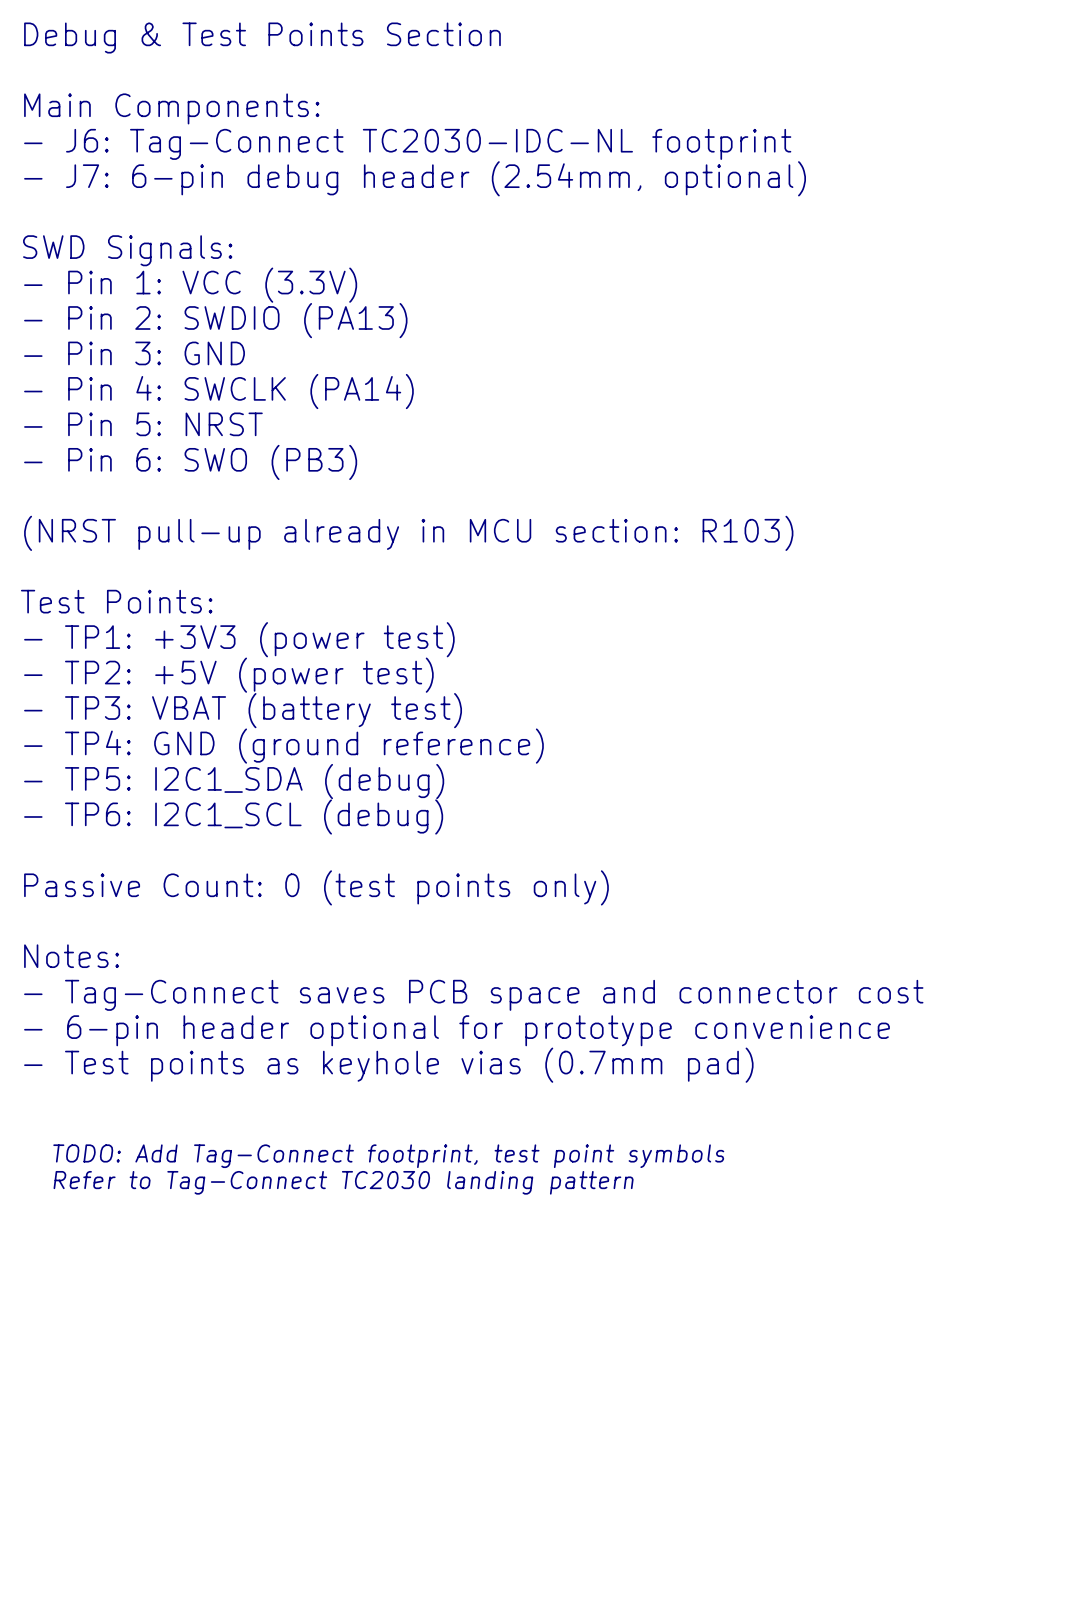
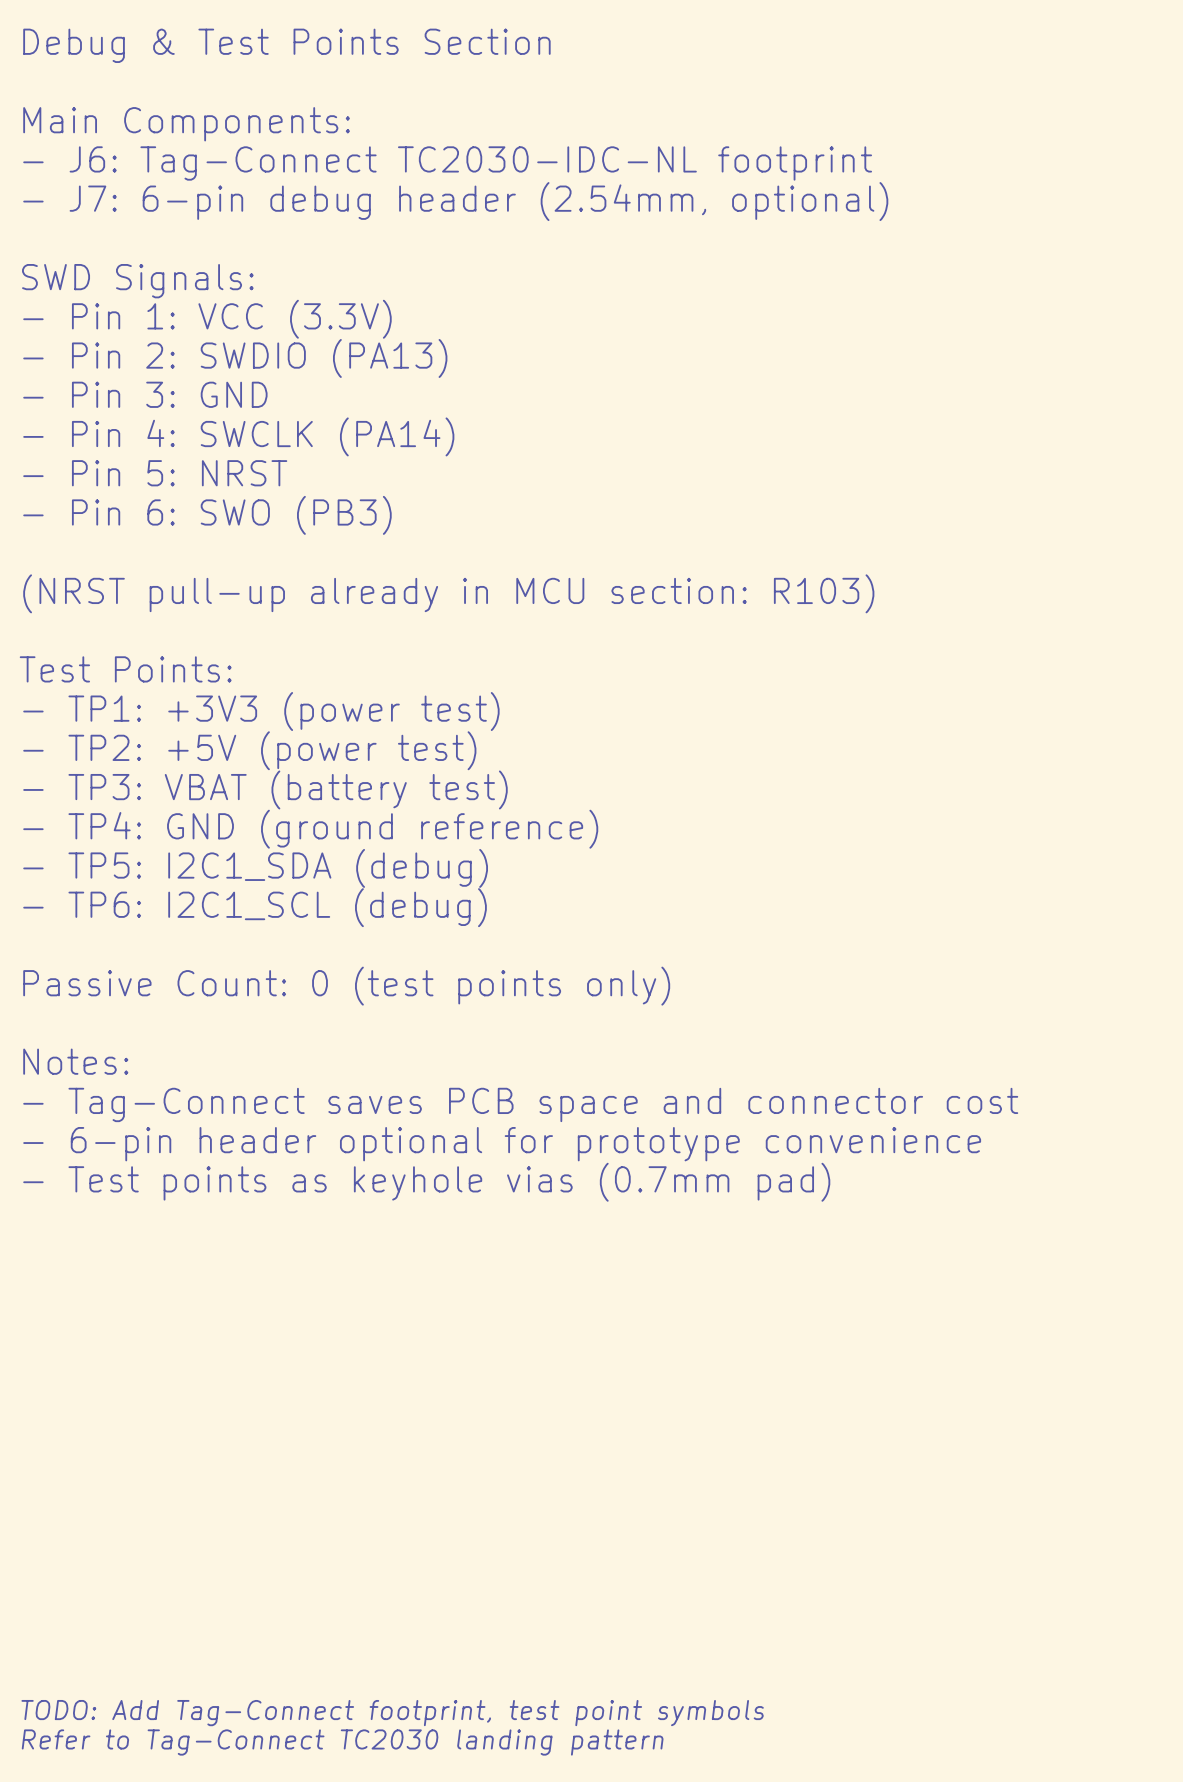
text: TODO: Add Tag-Connect footprint, test point symbols (388, 1156) -> none
text: Refer to Tag-Connect TC2030 landing pattern (343, 1182) -> none
text: none -> TODO: Add Tag-Connect footprint, test point symbols (392, 1713)
text: none -> Refer to Tag-Connect TC2030 landing pattern (342, 1742)

